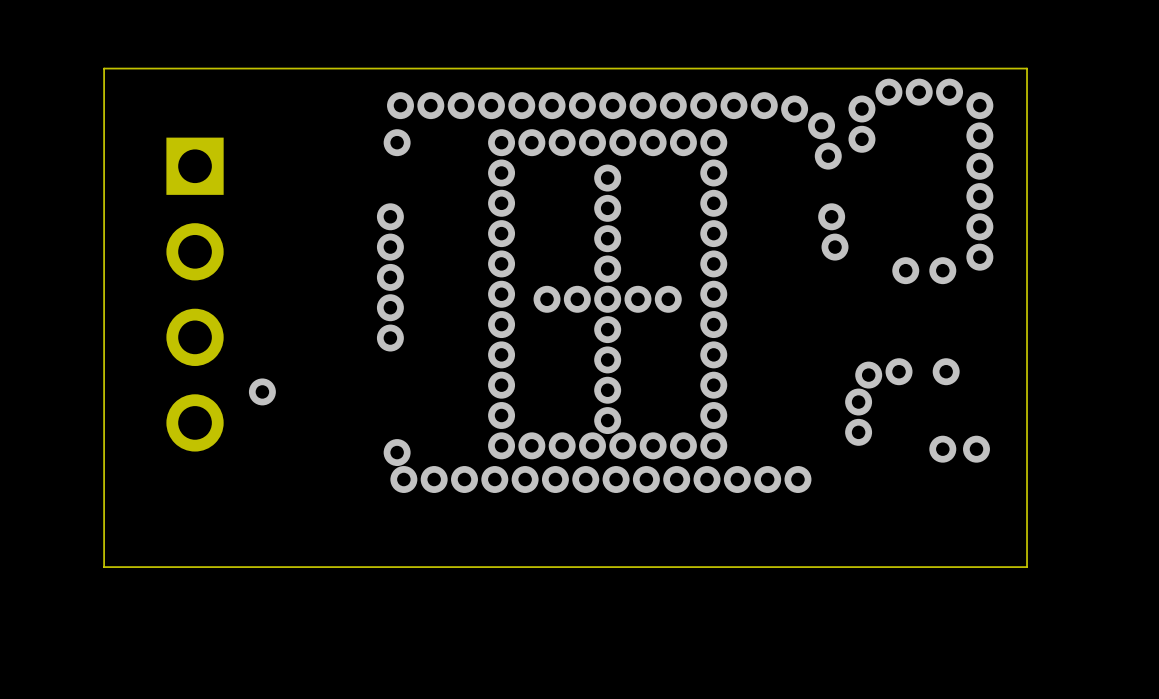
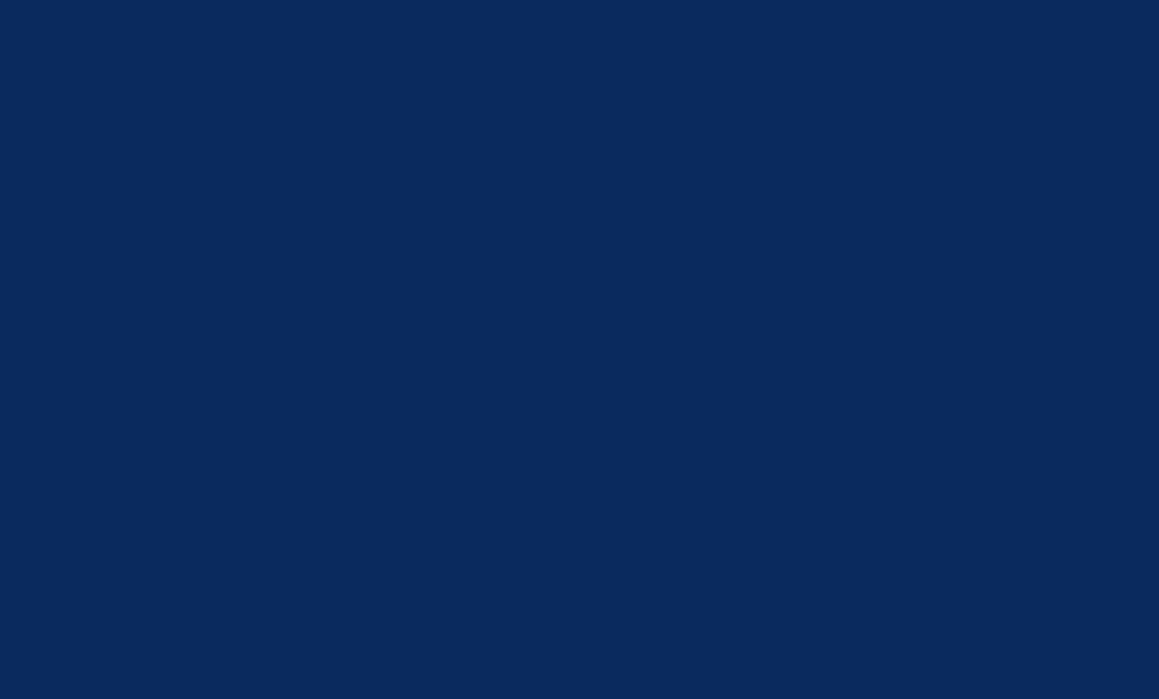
board edge: (1027, 68) (1027, 567) (104, 567) (104, 68) (1027, 68) -> none
via: (888, 92) -> none
via: (919, 92) -> none
via: (949, 92) -> none
via: (400, 105) -> none
via: (430, 105) -> none
via: (461, 105) -> none
via: (491, 105) -> none
via: (521, 105) -> none
via: (552, 105) -> none
via: (582, 105) -> none
via: (612, 105) -> none
via: (643, 105) -> none
via: (673, 105) -> none
via: (703, 105) -> none
via: (733, 105) -> none
via: (764, 105) -> none
via: (979, 105) -> none
via: (794, 108) -> none
via: (861, 108) -> none
via: (821, 125) -> none
via: (979, 135) -> none
via: (861, 139) -> none
via: (397, 142) -> none
via: (501, 142) -> none
via: (531, 142) -> none
via: (562, 142) -> none
via: (592, 142) -> none
via: (622, 142) -> none
via: (653, 142) -> none
via: (683, 142) -> none
via: (713, 142) -> none
via: (828, 156) -> none
via: (979, 166) -> none
via: (501, 172) -> none
via: (713, 172) -> none
via: (607, 178) -> none
via: (979, 196) -> none
via: (501, 203) -> none
via: (713, 203) -> none
via: (607, 208) -> none
via: (390, 216) -> none
via: (831, 216) -> none
via: (979, 226) -> none
via: (501, 233) -> none
via: (713, 233) -> none
via: (607, 238) -> none
via: (390, 247) -> none
via: (835, 247) -> none
via: (979, 257) -> none
via: (501, 263) -> none
via: (713, 263) -> none
via: (607, 268) -> none
via: (905, 270) -> none
via: (942, 270) -> none
via: (390, 277) -> none
part: (195, 294) -> none
via: (501, 294) -> none
via: (713, 294) -> none
via: (547, 299) -> none
via: (577, 299) -> none
via: (607, 299) -> none
via: (637, 299) -> none
via: (668, 299) -> none
via: (390, 307) -> none
via: (501, 324) -> none
via: (713, 324) -> none
via: (607, 329) -> none
via: (390, 338) -> none
via: (501, 354) -> none
via: (713, 354) -> none
via: (607, 359) -> none
via: (899, 371) -> none
via: (946, 371) -> none
via: (868, 375) -> none
via: (501, 385) -> none
via: (713, 385) -> none
via: (607, 390) -> none
via: (262, 391) -> none
via: (858, 402) -> none
via: (501, 415) -> none
via: (713, 415) -> none
via: (607, 420) -> none
via: (858, 432) -> none
via: (501, 445) -> none
via: (531, 445) -> none
via: (562, 445) -> none
via: (592, 445) -> none
via: (622, 445) -> none
via: (653, 445) -> none
via: (683, 445) -> none
via: (713, 445) -> none
via: (942, 449) -> none
via: (976, 449) -> none
via: (397, 452) -> none
via: (403, 479) -> none
via: (434, 479) -> none
via: (464, 479) -> none
via: (494, 479) -> none
via: (525, 479) -> none
via: (555, 479) -> none
via: (585, 479) -> none
via: (616, 479) -> none
via: (646, 479) -> none
via: (676, 479) -> none
via: (707, 479) -> none
via: (737, 479) -> none
via: (767, 479) -> none
via: (797, 479) -> none

